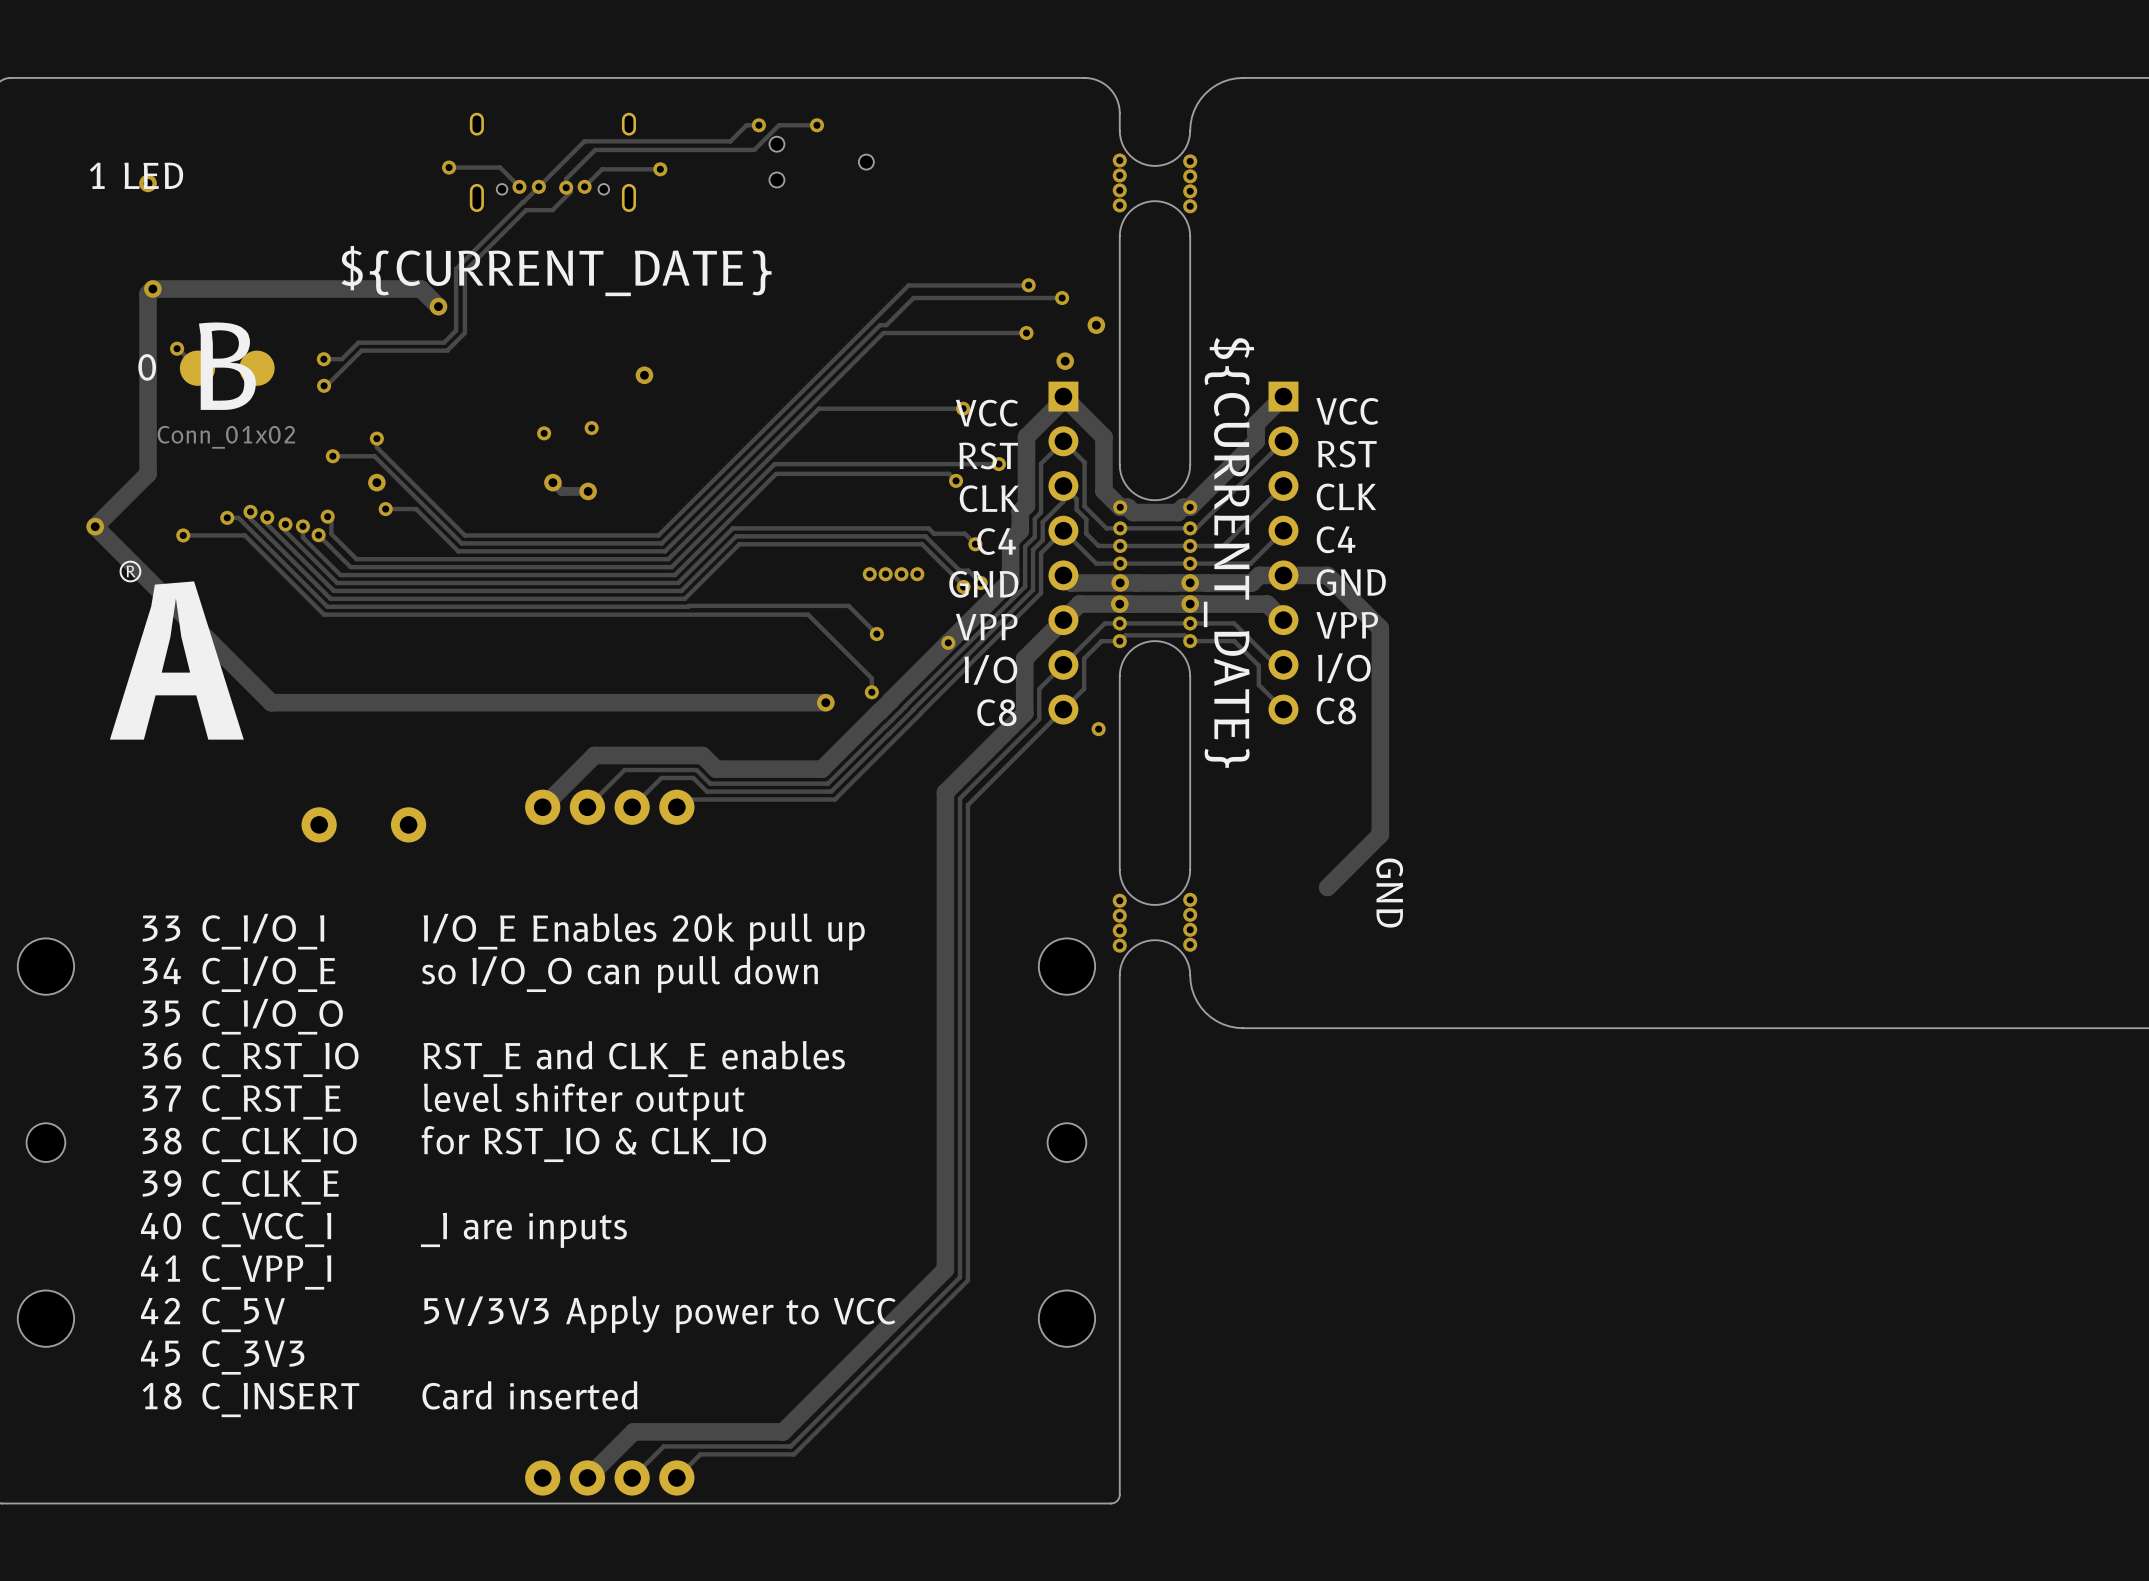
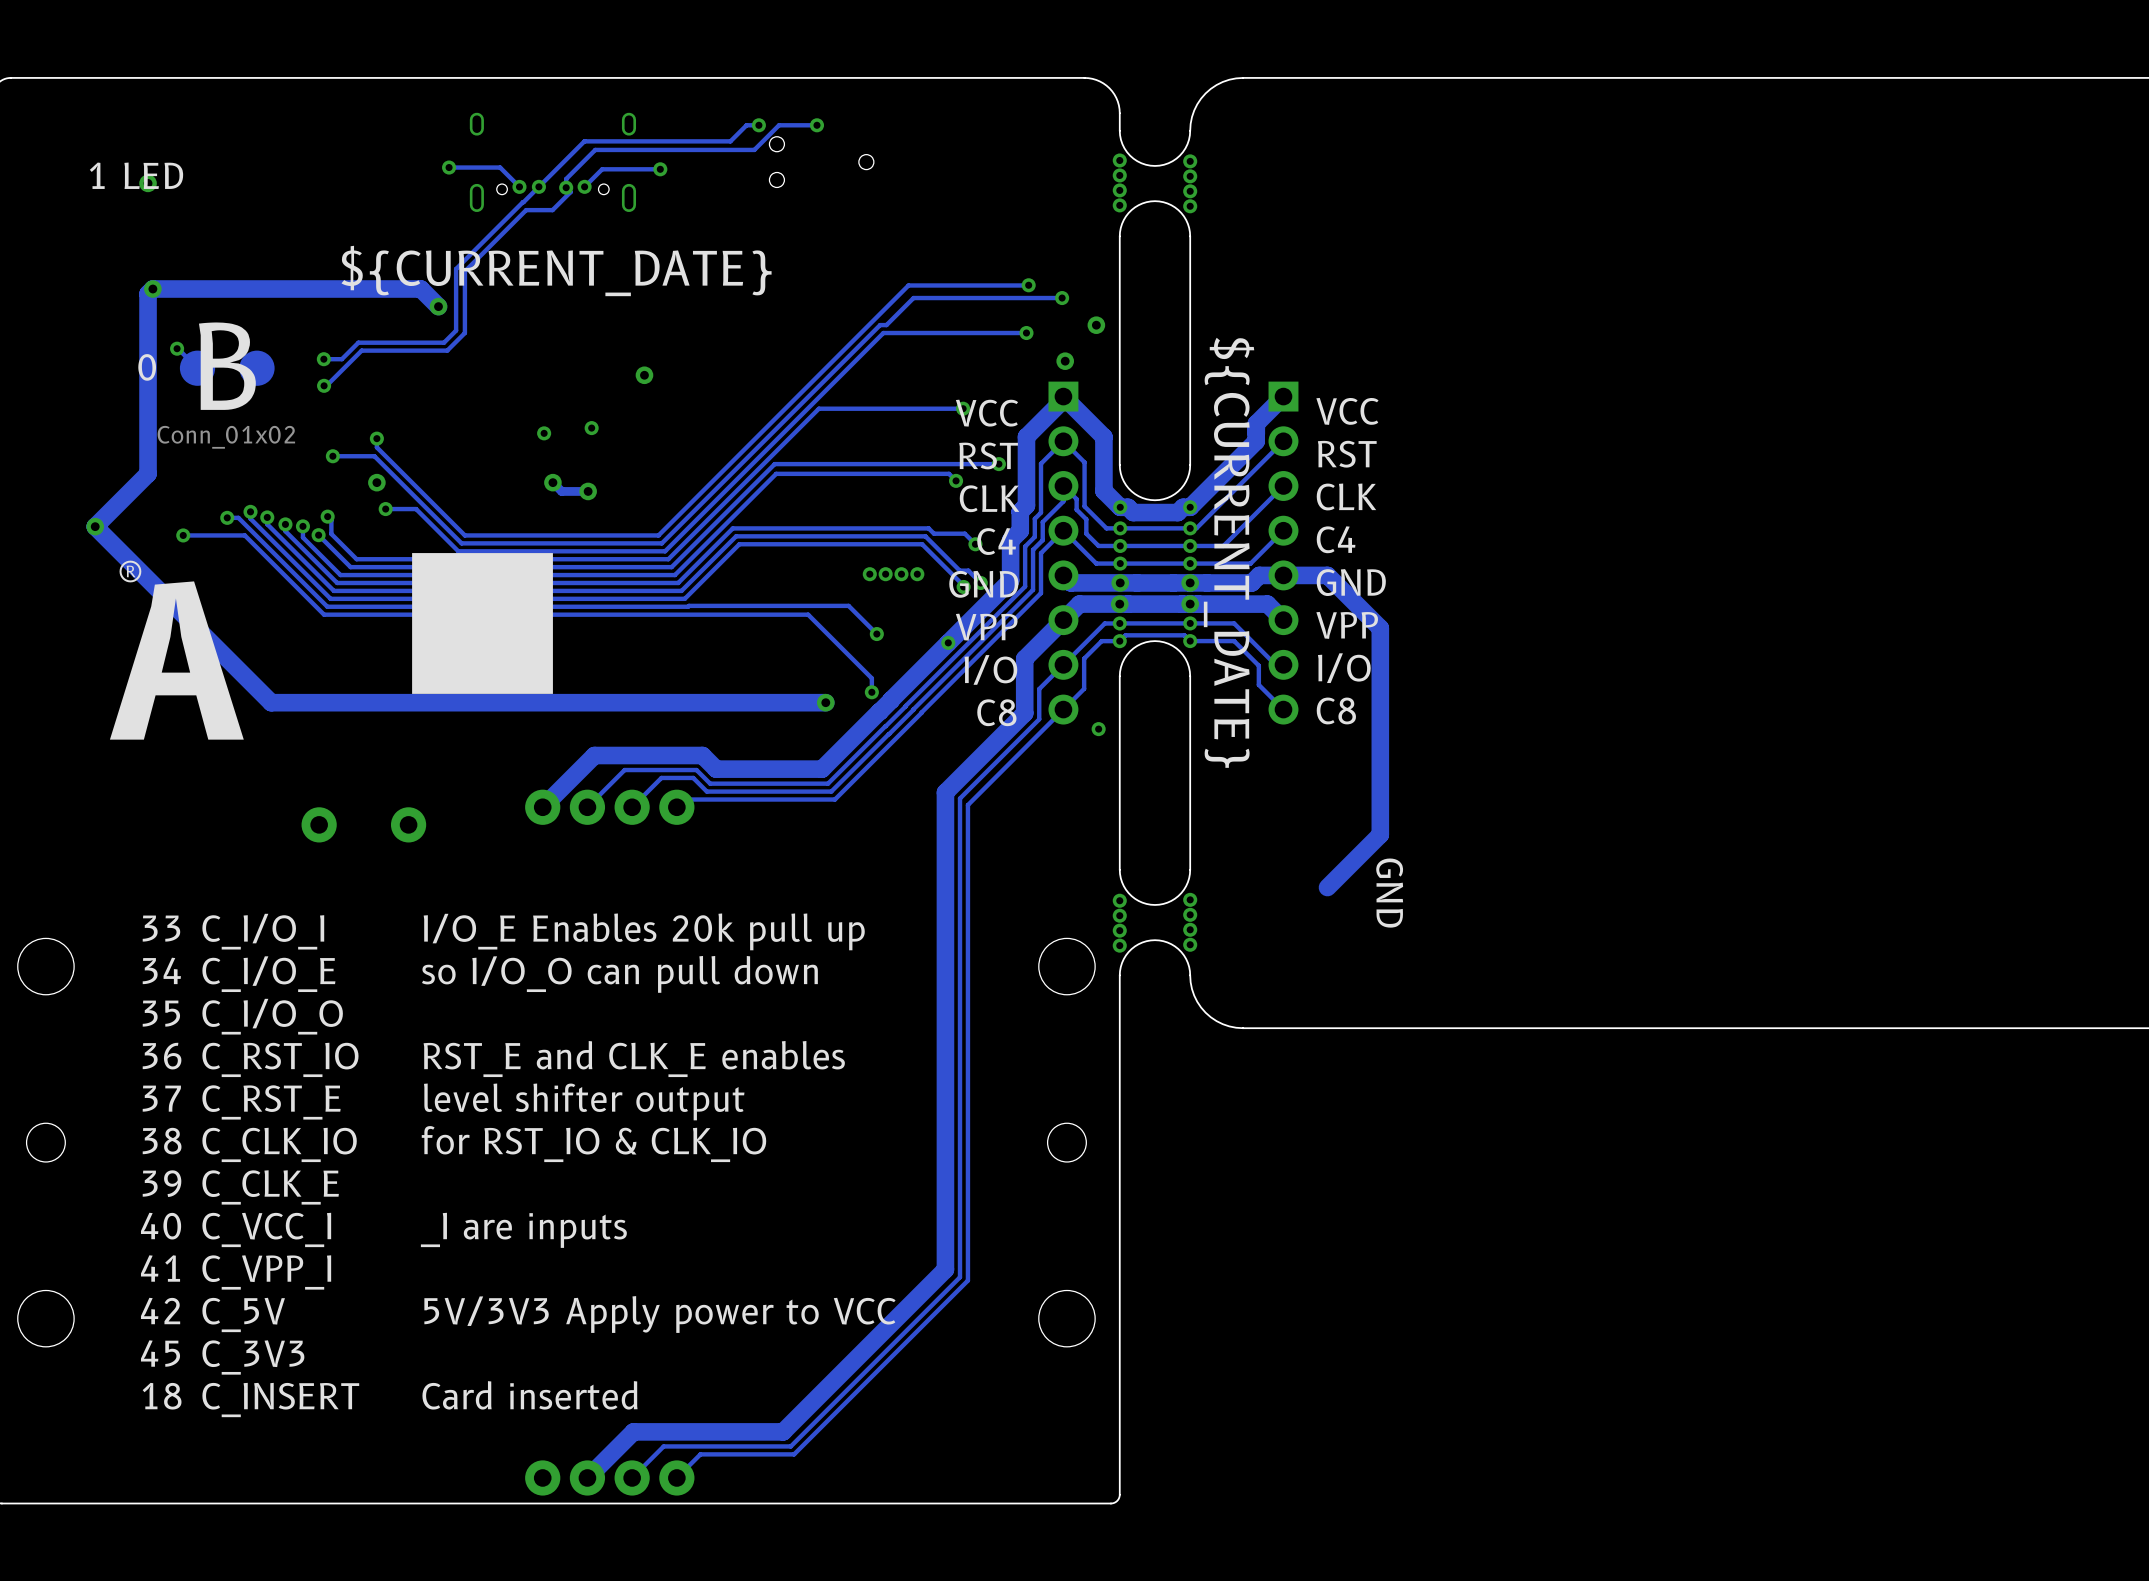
drawing: none -> [412, 553, 553, 694]

